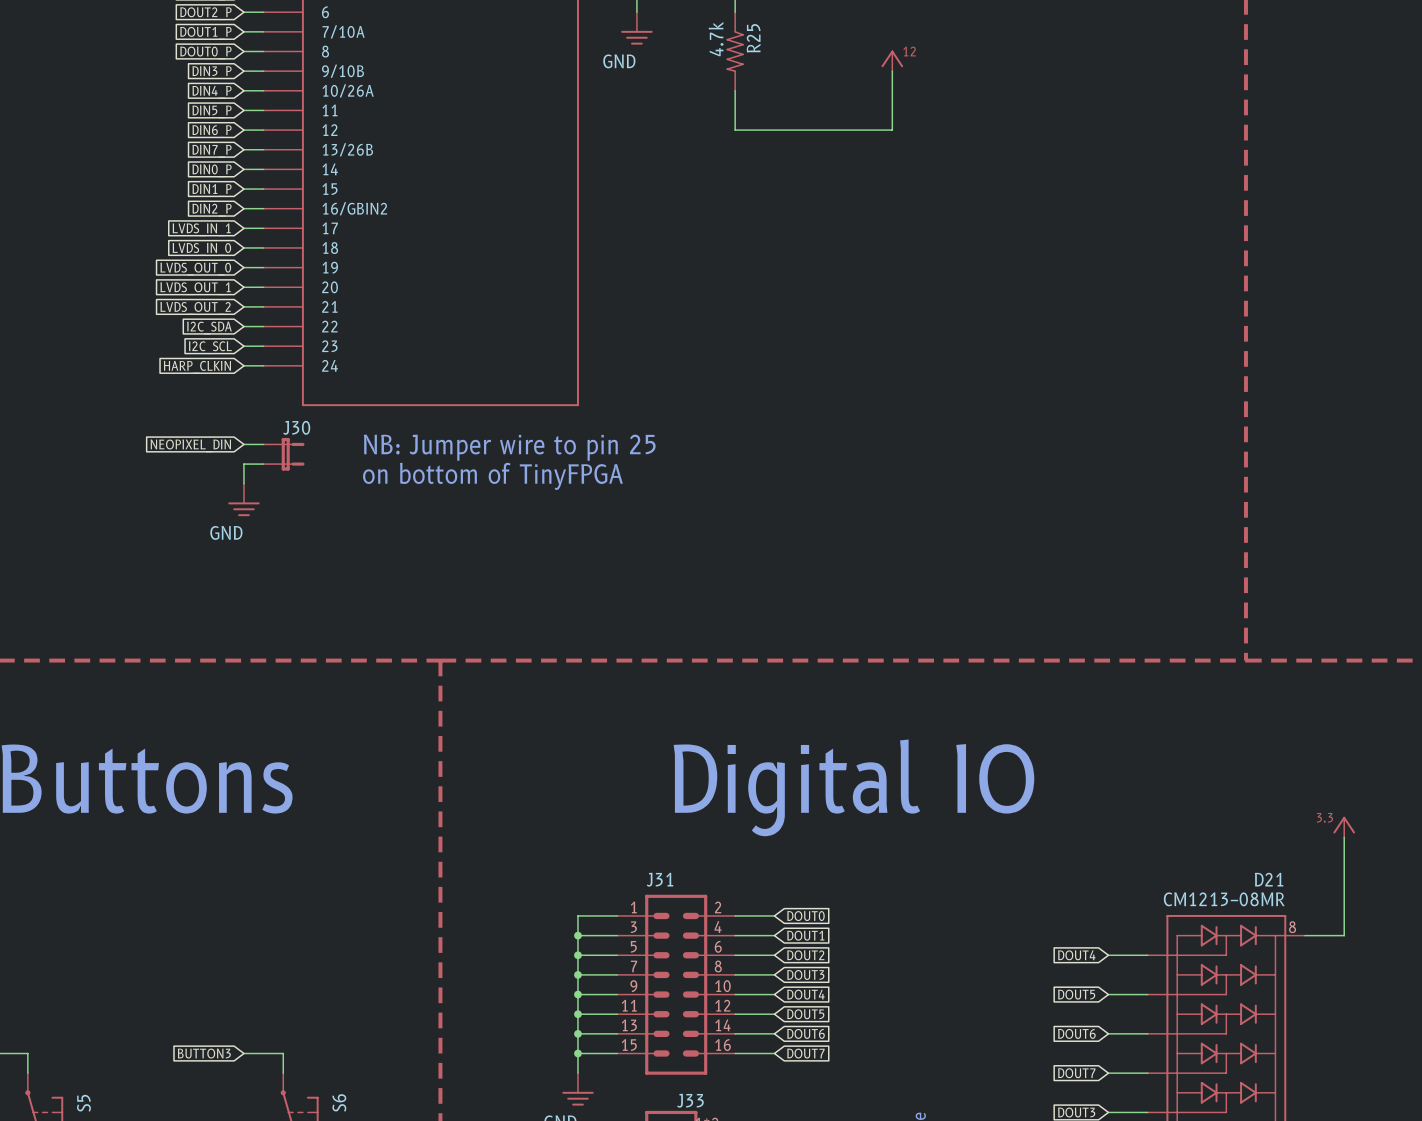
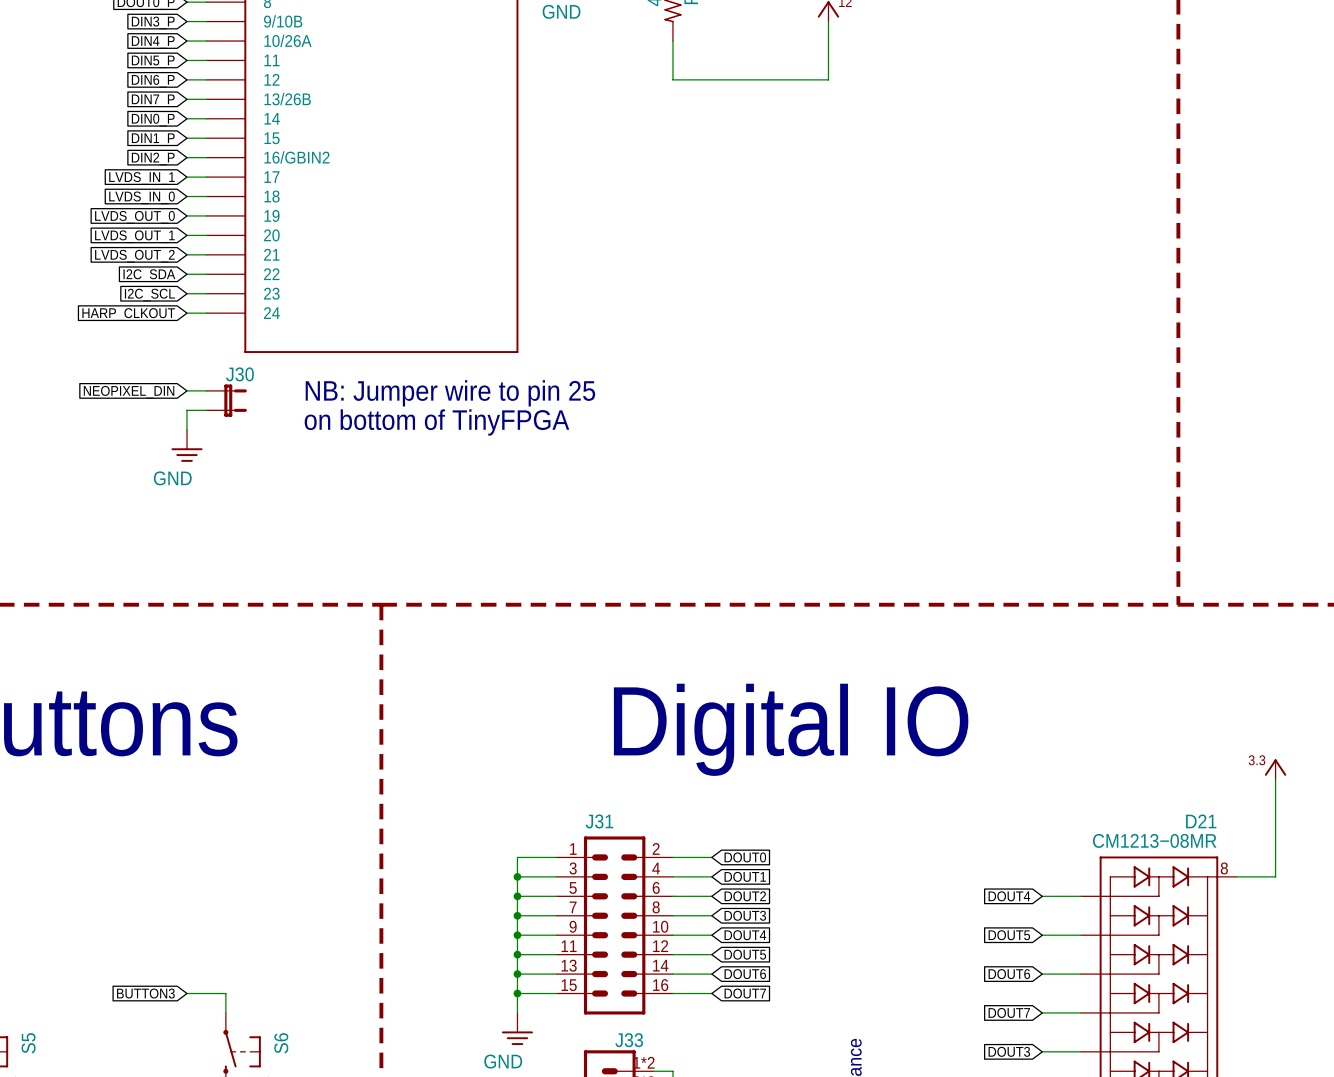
global label: HARP_CLKIN (197, 367) -> HARP_CLKOUT (128, 314)

